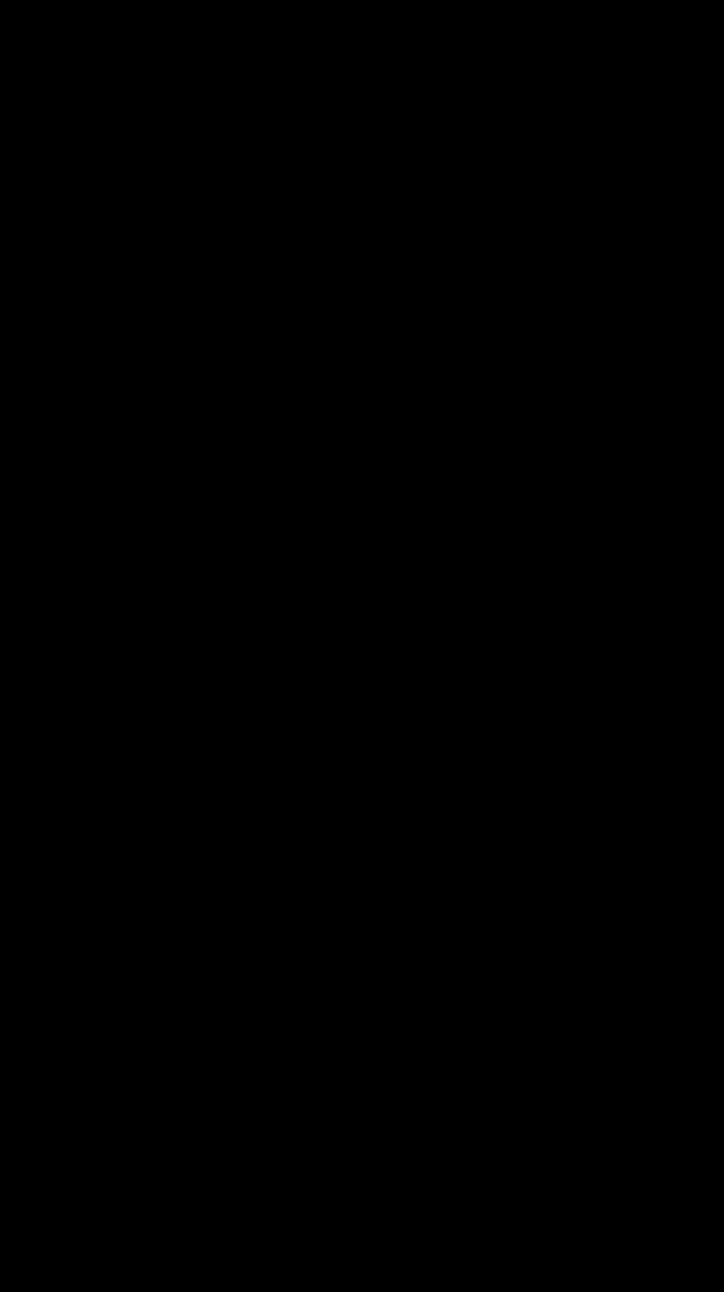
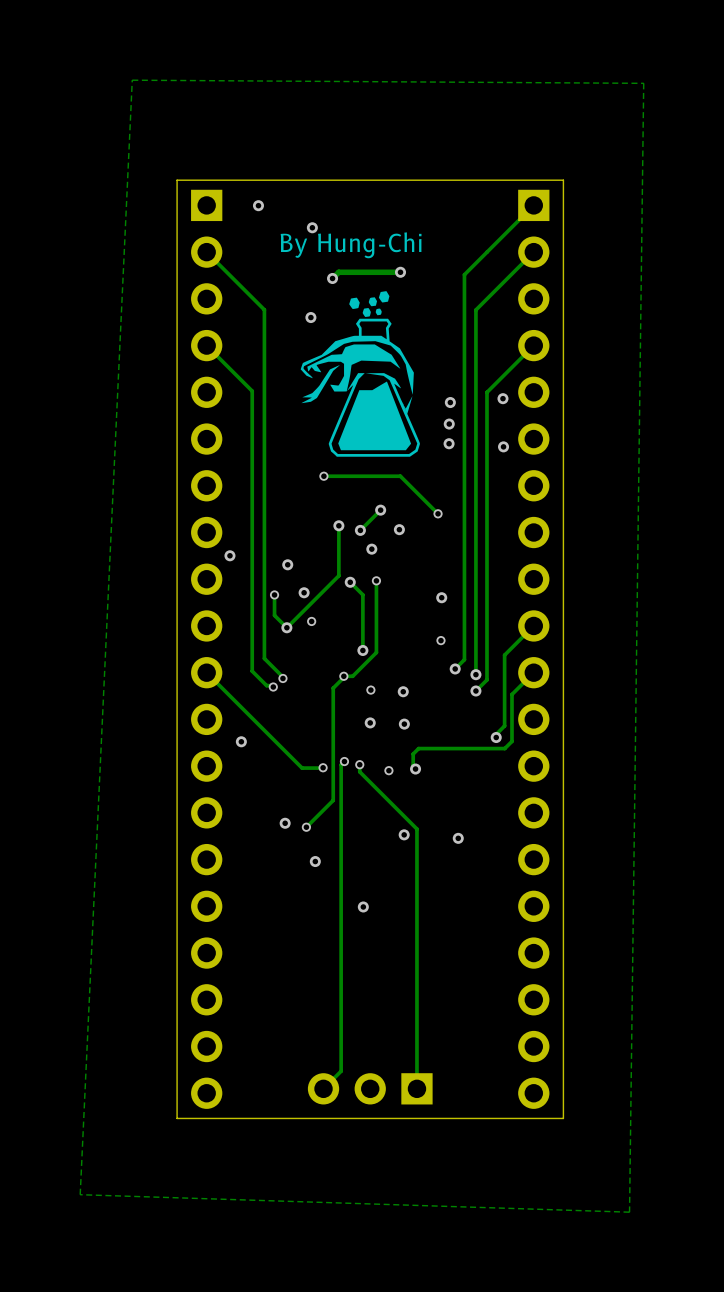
zone outline: none -> (132, 80) (80, 1194) (629, 1212) (643, 83) (132, 80)
board edge: none -> (563, 180) (177, 180) (177, 1118) (563, 1118) (563, 180)
via: none -> (258, 205)
track: none -> (533, 205) (464, 274) (464, 659) (455, 668)
via: none -> (312, 227)
text: none -> By Hung-Chi (351, 245)
track: none -> (206, 252) (264, 309) (264, 658) (283, 678)
track: none -> (533, 252) (475, 309) (475, 674)
track: none -> (400, 272) (338, 272) (332, 278)
via: none -> (400, 272)
via: none -> (332, 278)
drawing: none -> [300, 291, 420, 457]
via: none -> (310, 317)
track: none -> (206, 345) (252, 391) (252, 671) (266, 685) (273, 687)
track: none -> (533, 345) (486, 392) (486, 679) (475, 690)
via: none -> (502, 398)
via: none -> (450, 402)
via: none -> (449, 424)
via: none -> (449, 443)
via: none -> (503, 446)
track: none -> (323, 476) (400, 476) (438, 513)
via: none -> (323, 476)
track: none -> (380, 510) (360, 530)
via: none -> (380, 510)
via: none -> (438, 513)
track: none -> (338, 525) (338, 575) (286, 627) (274, 615) (274, 594)
via: none -> (338, 525)
via: none -> (399, 529)
via: none -> (360, 530)
via: none -> (371, 549)
via: none -> (229, 555)
via: none -> (287, 564)
track: none -> (376, 580) (376, 652) (352, 676) (343, 676) (333, 688) (333, 800) (306, 827)
via: none -> (376, 580)
track: none -> (350, 582) (362, 594) (362, 650)
via: none -> (350, 582)
via: none -> (304, 592)
via: none -> (274, 594)
via: none -> (441, 597)
via: none -> (311, 621)
track: none -> (533, 625) (504, 655) (504, 725) (496, 734) (496, 737)
via: none -> (286, 627)
via: none -> (440, 640)
part: none -> (206, 649)
part: none -> (533, 649)
via: none -> (362, 650)
via: none -> (455, 668)
track: none -> (206, 672) (302, 768) (323, 767)
track: none -> (533, 672) (511, 694) (511, 741) (504, 748) (418, 748) (413, 754) (413, 765) (415, 769)
via: none -> (475, 674)
via: none -> (343, 676)
via: none -> (282, 678)
via: none -> (273, 687)
via: none -> (370, 690)
via: none -> (475, 690)
via: none -> (403, 691)
via: none -> (370, 722)
via: none -> (404, 724)
via: none -> (496, 737)
via: none -> (241, 741)
track: none -> (344, 761) (341, 764) (341, 1071) (323, 1088)
via: none -> (344, 761)
track: none -> (359, 764) (359, 771) (416, 829) (416, 1088)
via: none -> (359, 764)
via: none -> (323, 767)
via: none -> (415, 769)
via: none -> (388, 770)
via: none -> (285, 823)
via: none -> (306, 827)
via: none -> (404, 834)
via: none -> (458, 838)
via: none -> (315, 861)
via: none -> (363, 906)
part: none -> (370, 1088)

